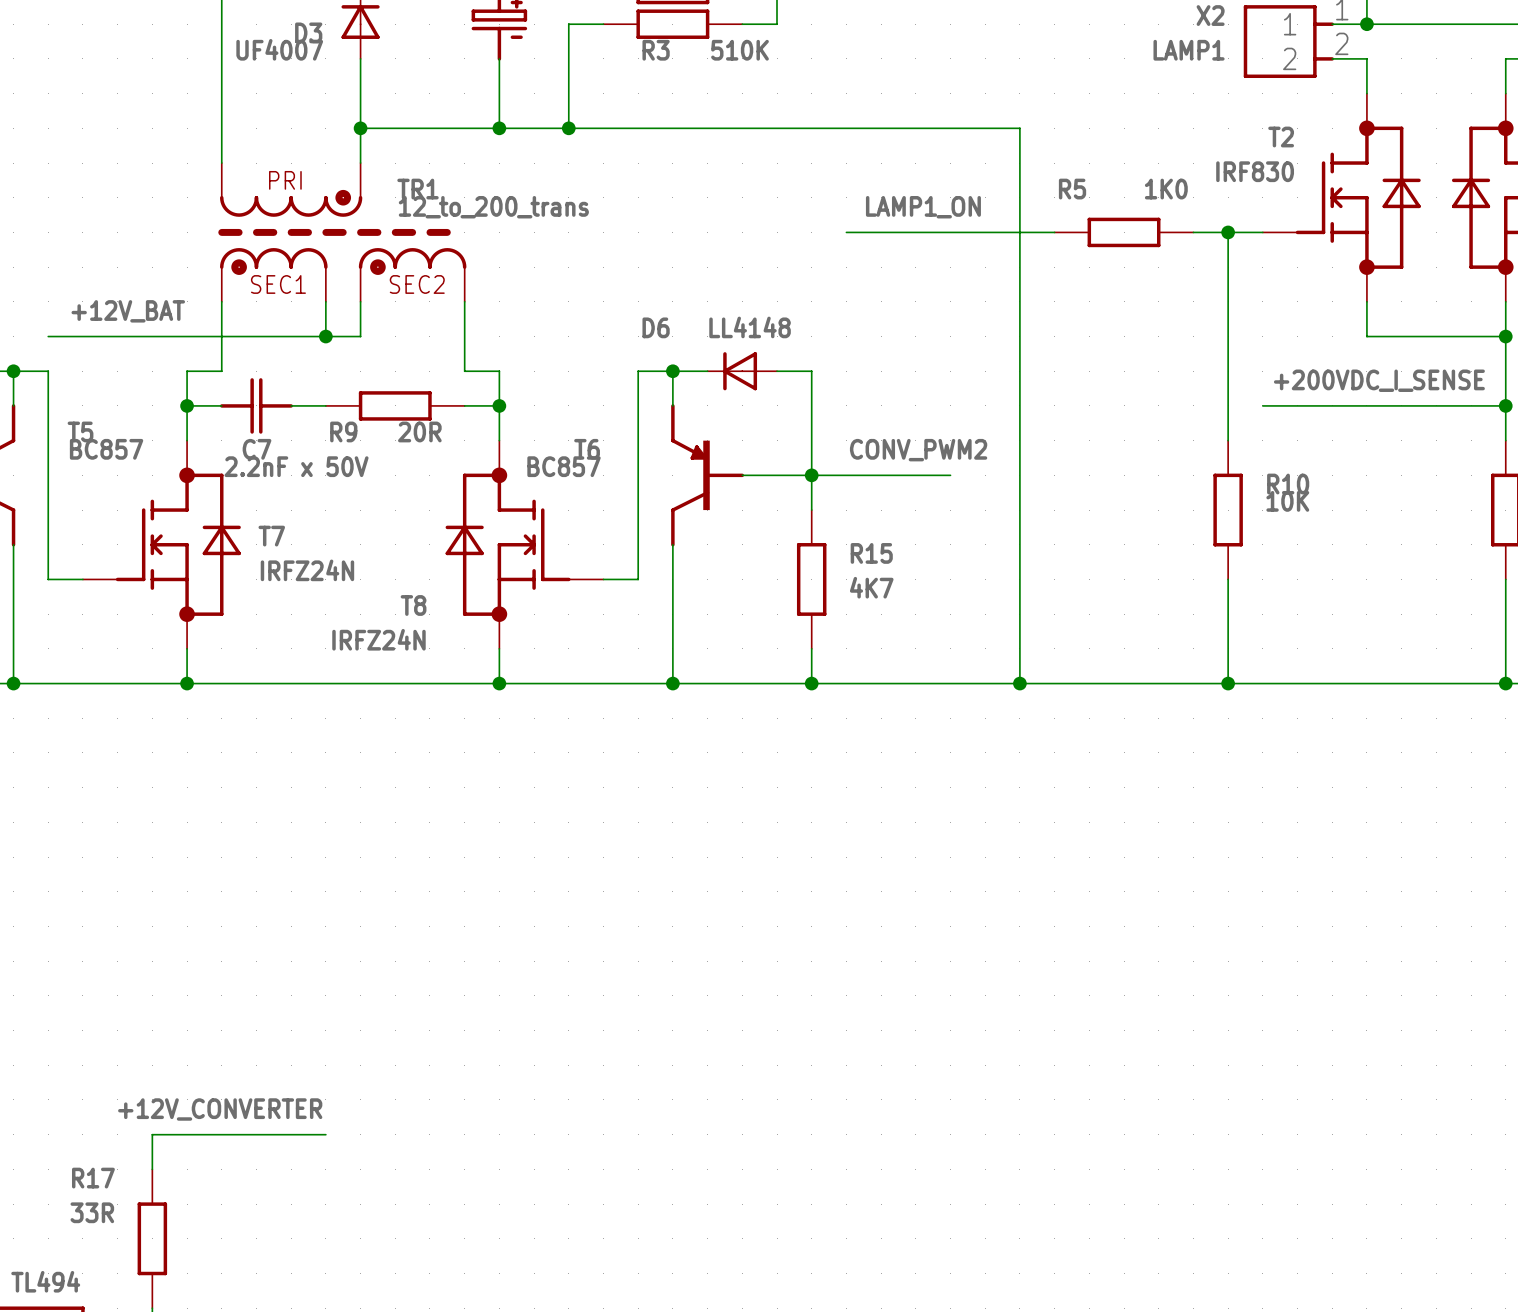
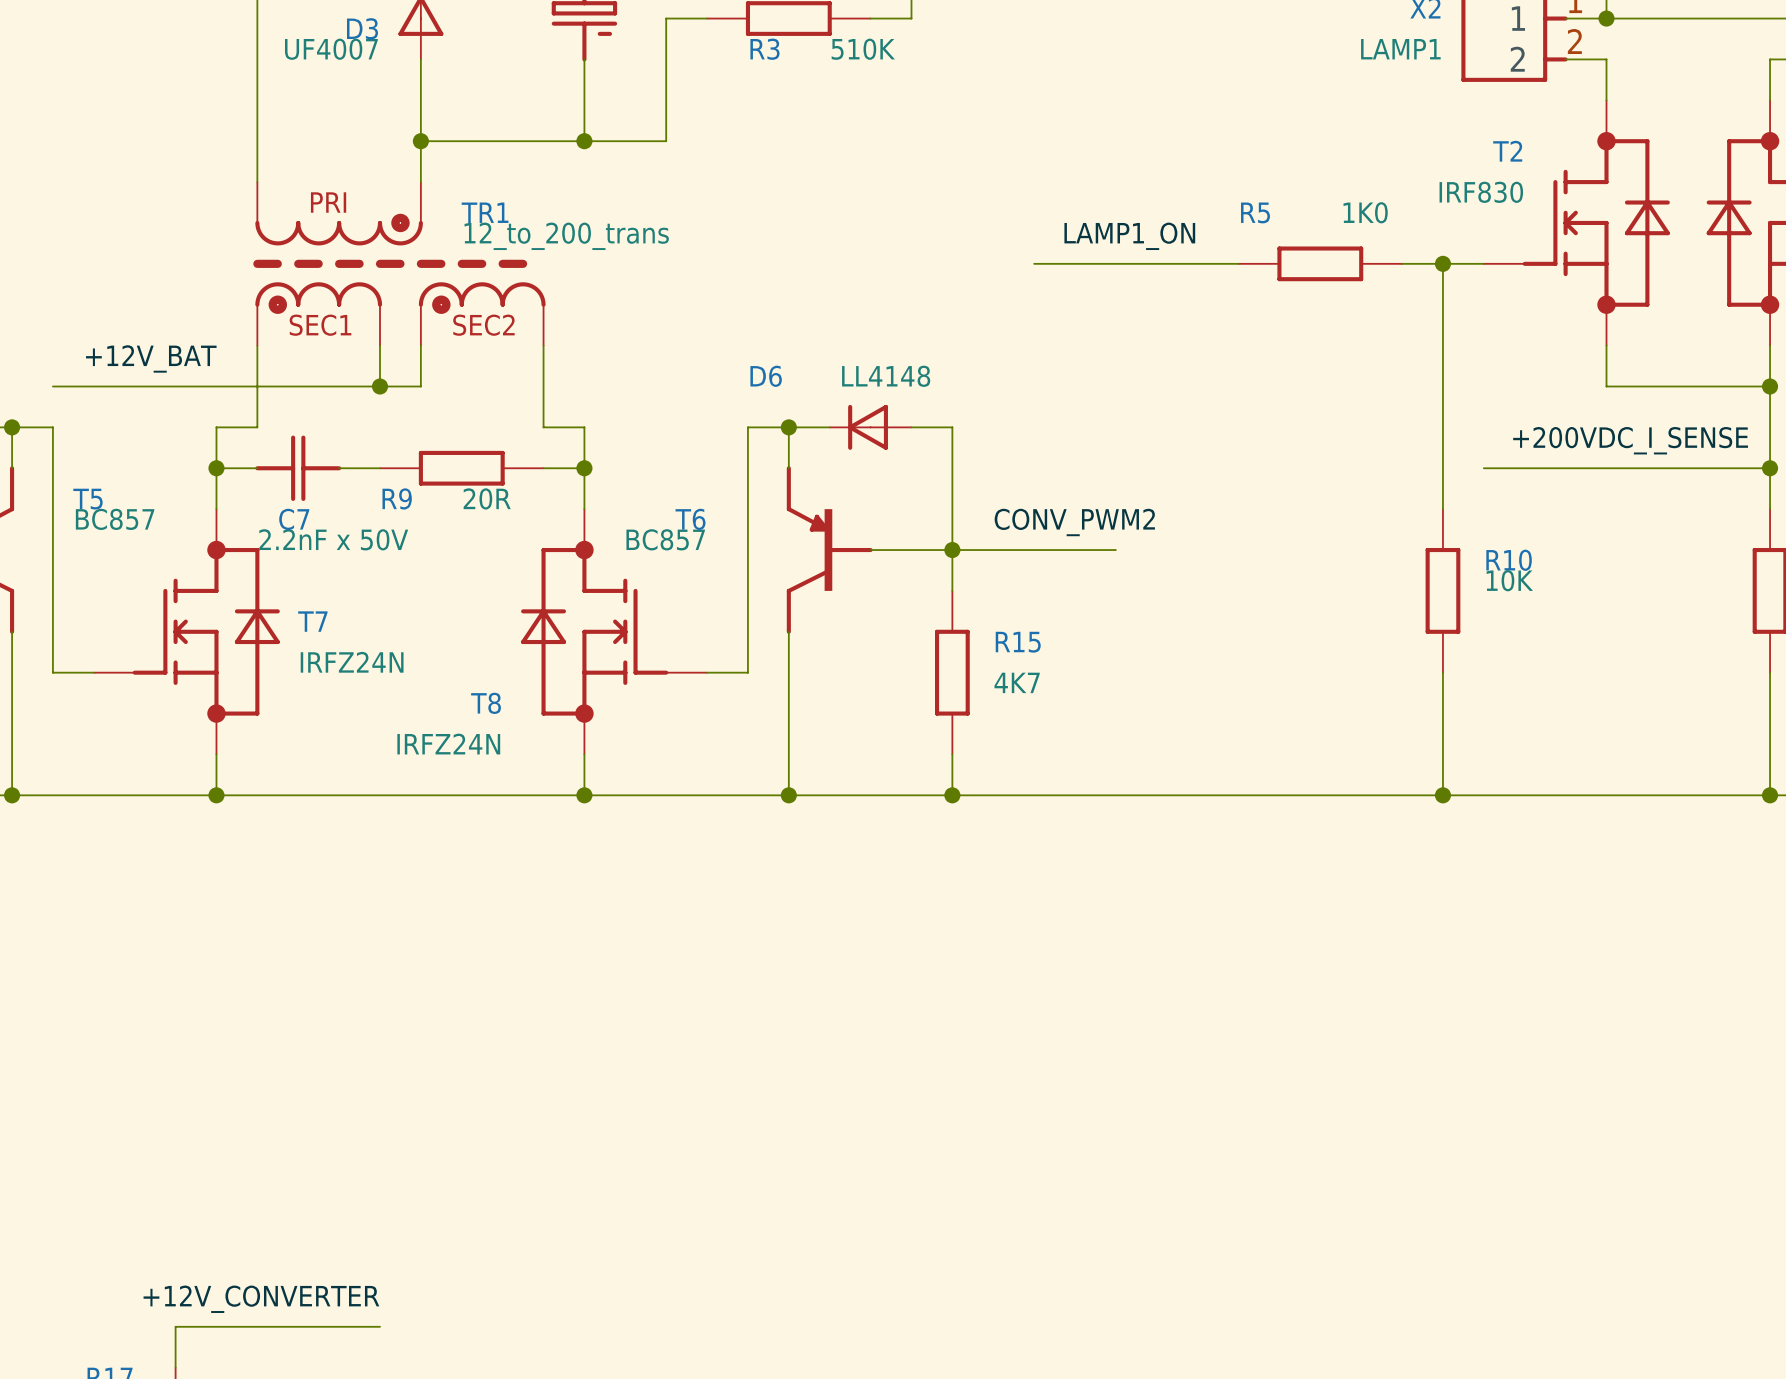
wire: (568, 128) (1019, 128) (1019, 683) -> none
junction: (568, 128) -> none
label position: LAMP1_ON (923, 207) -> LAMP1_ON (1129, 236)
wire: (846, 232) (881, 232) -> none
junction: (1019, 683) -> none

